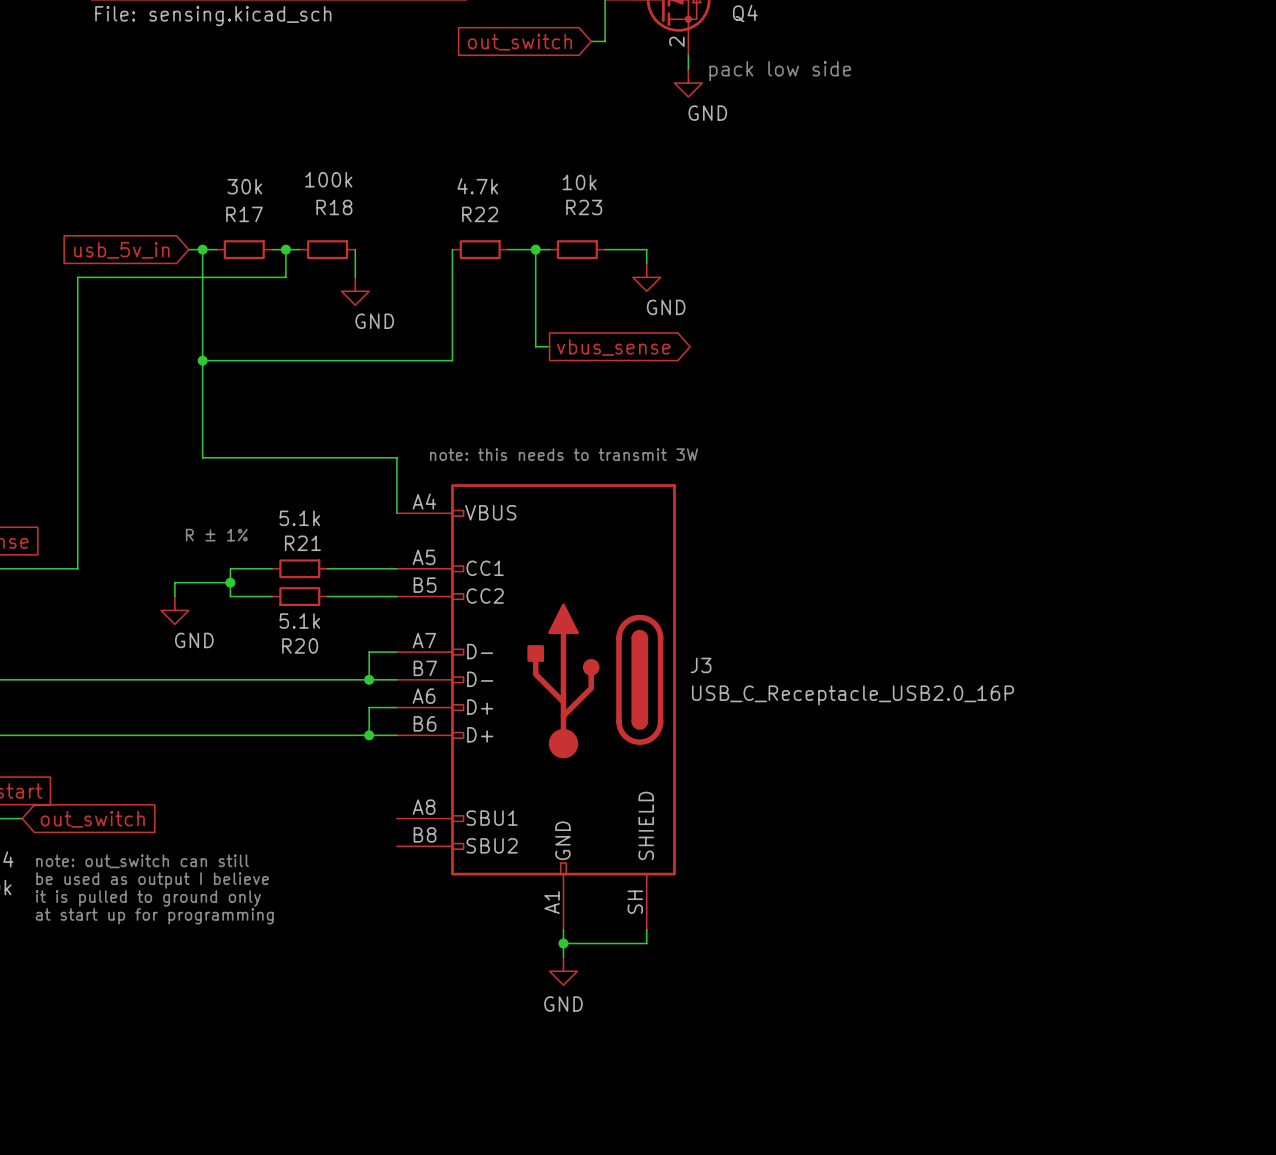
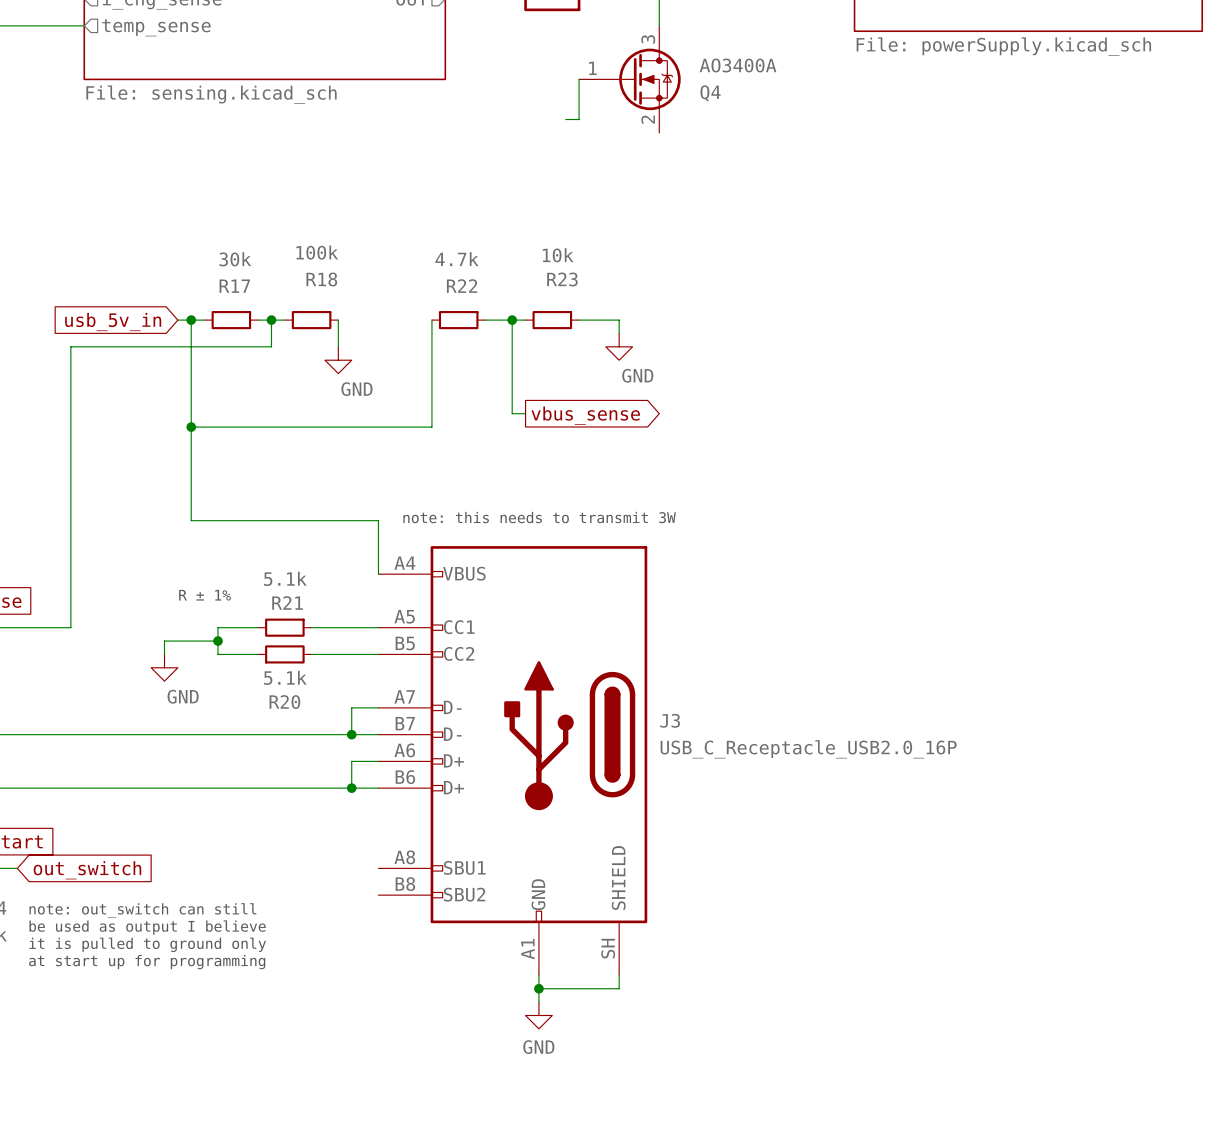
global label: out_switch (520, 42) -> none
wire: (688, 55) (688, 69) -> none
text: pack low side (780, 71) -> none
power symbol: GND (688, 83) -> none

